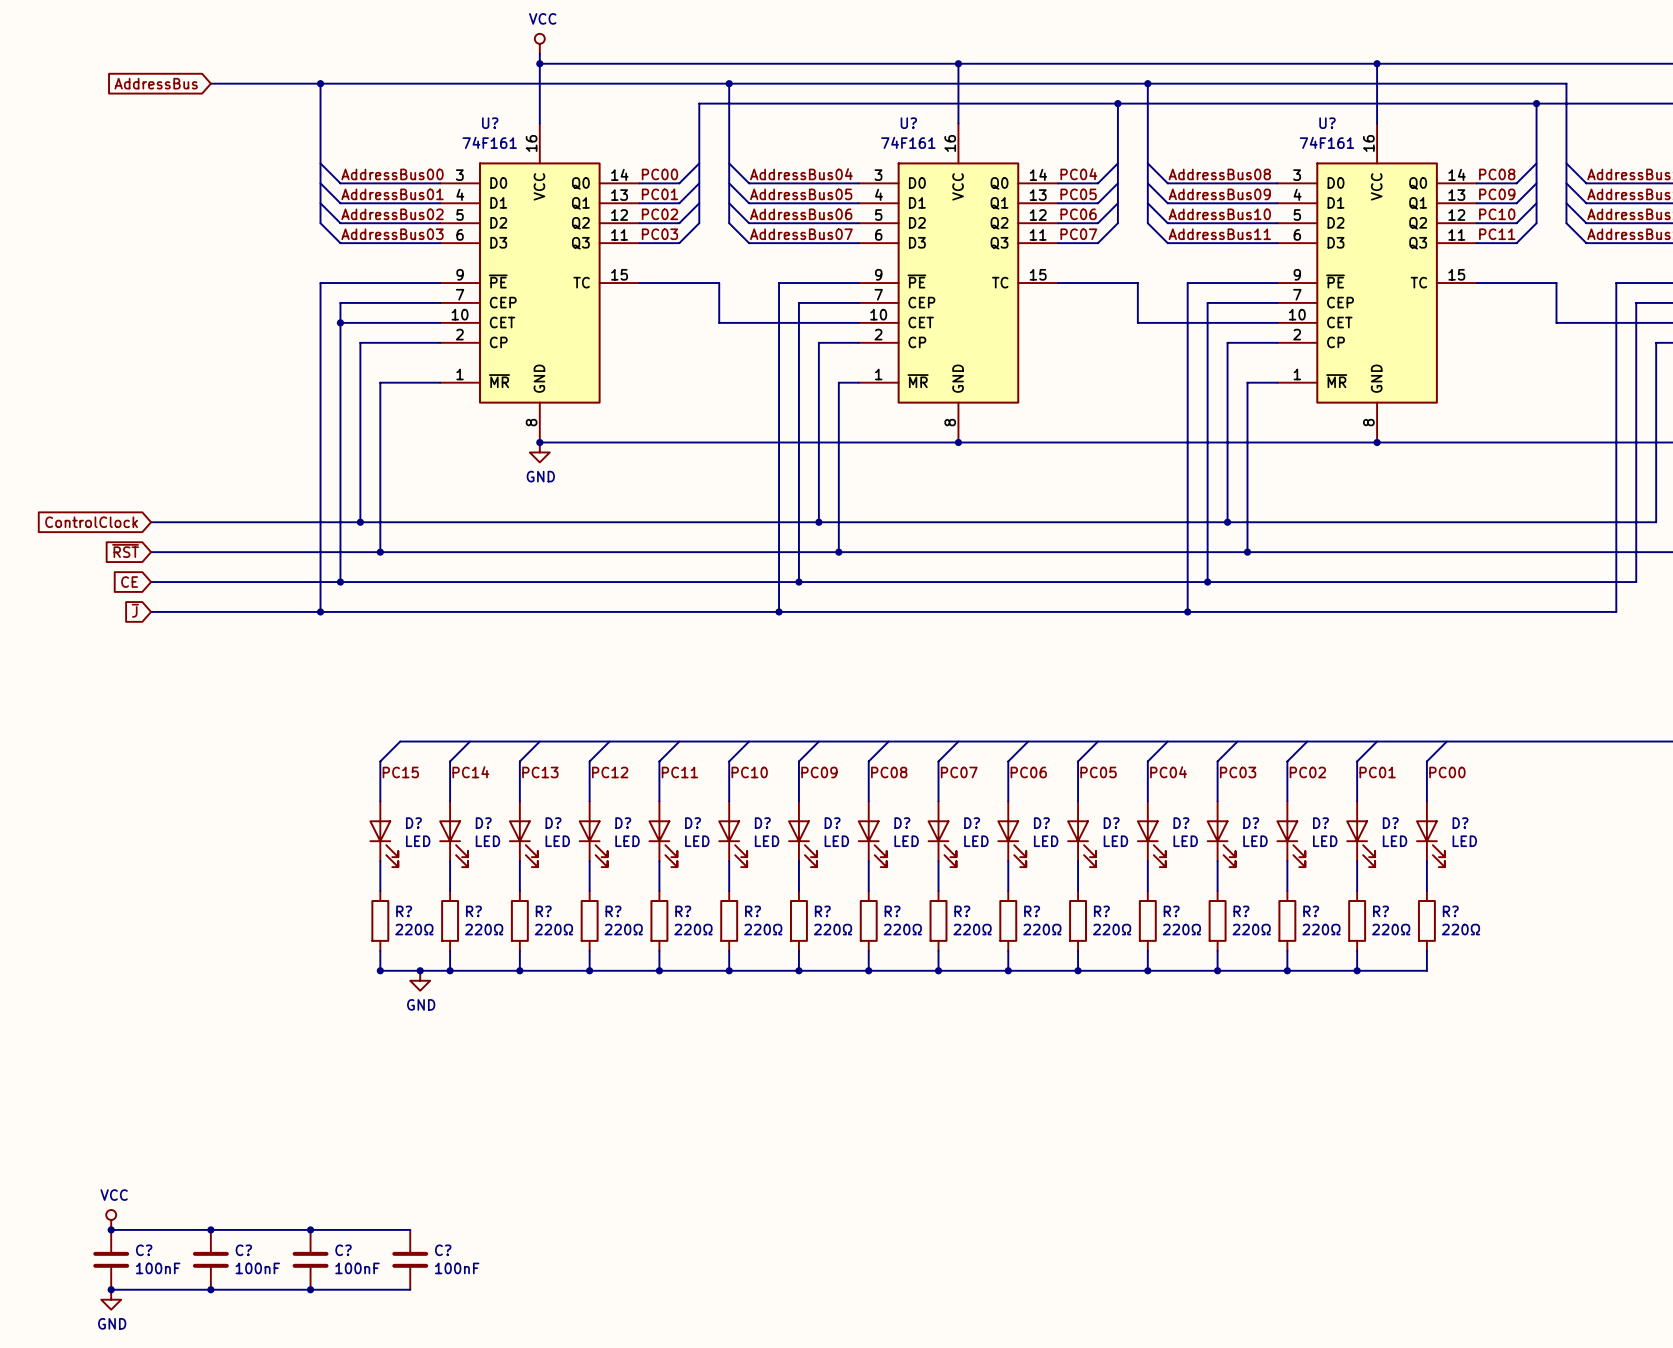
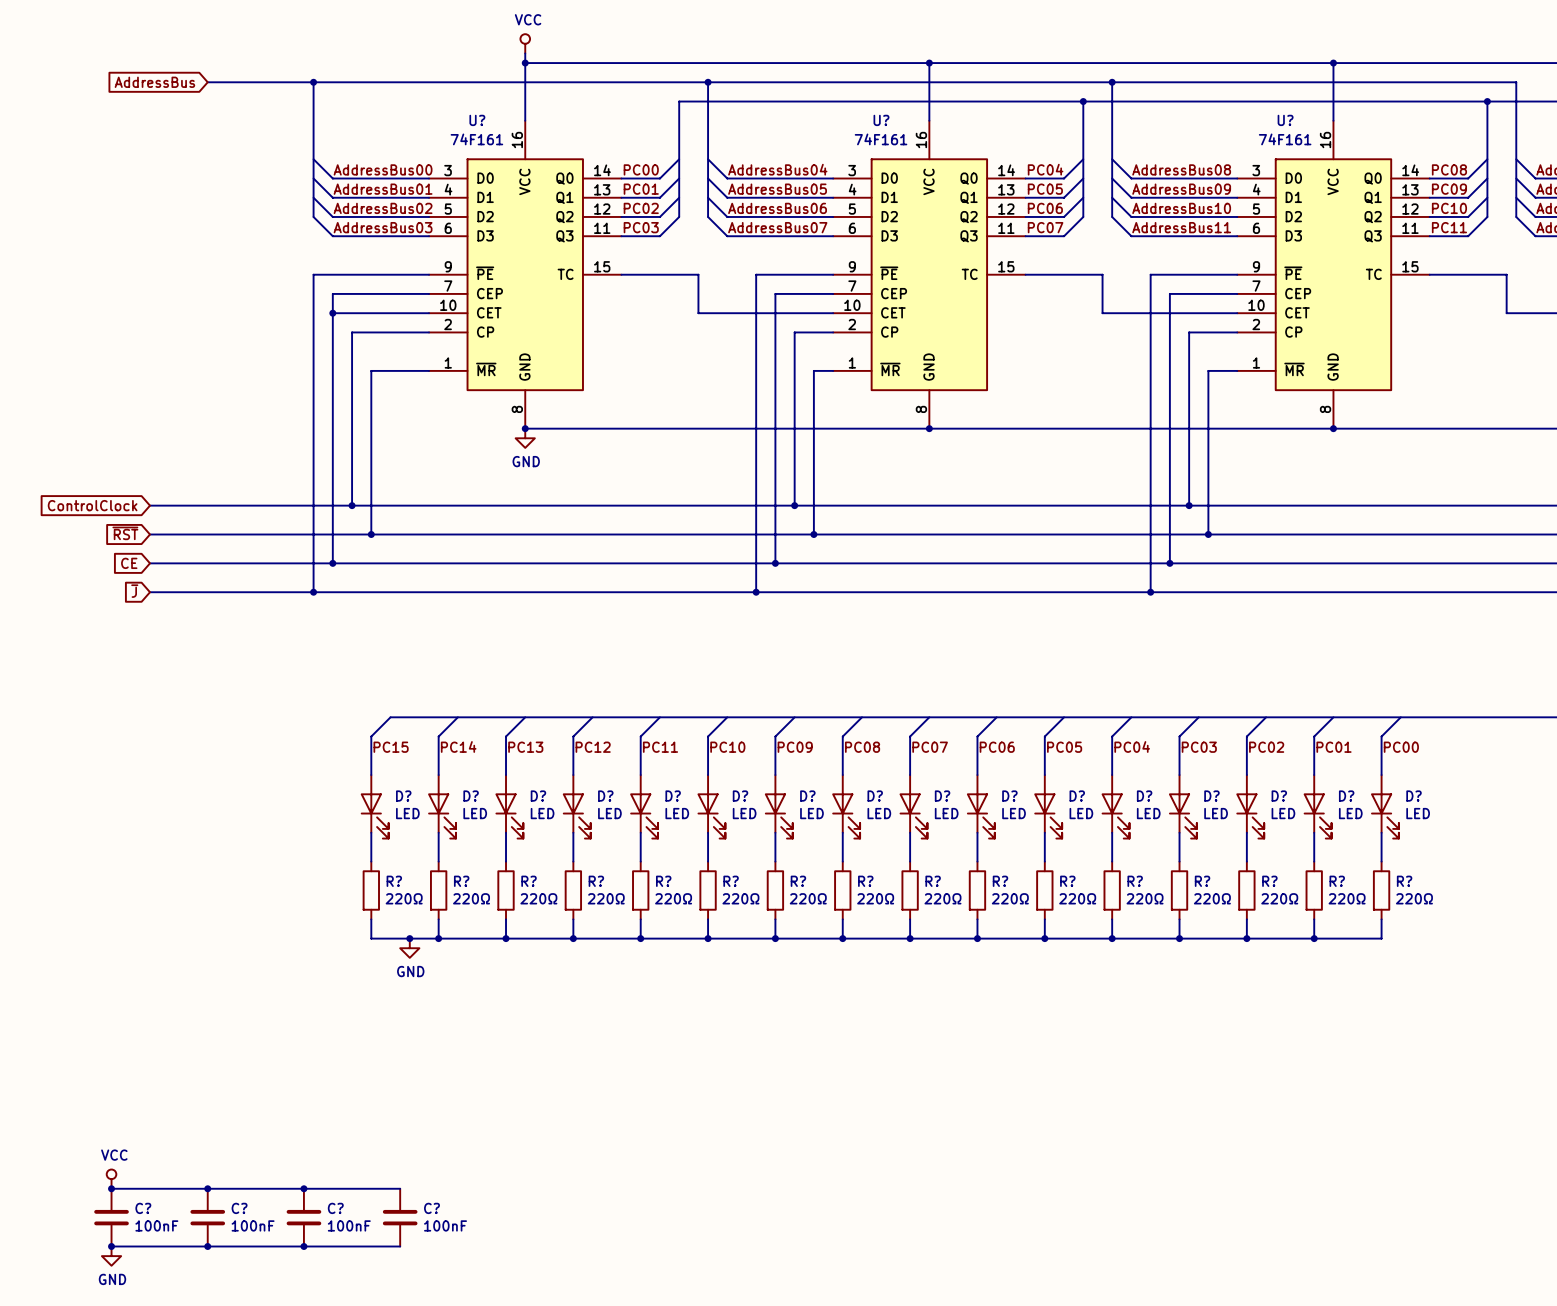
junction: (380, 970) -> none

